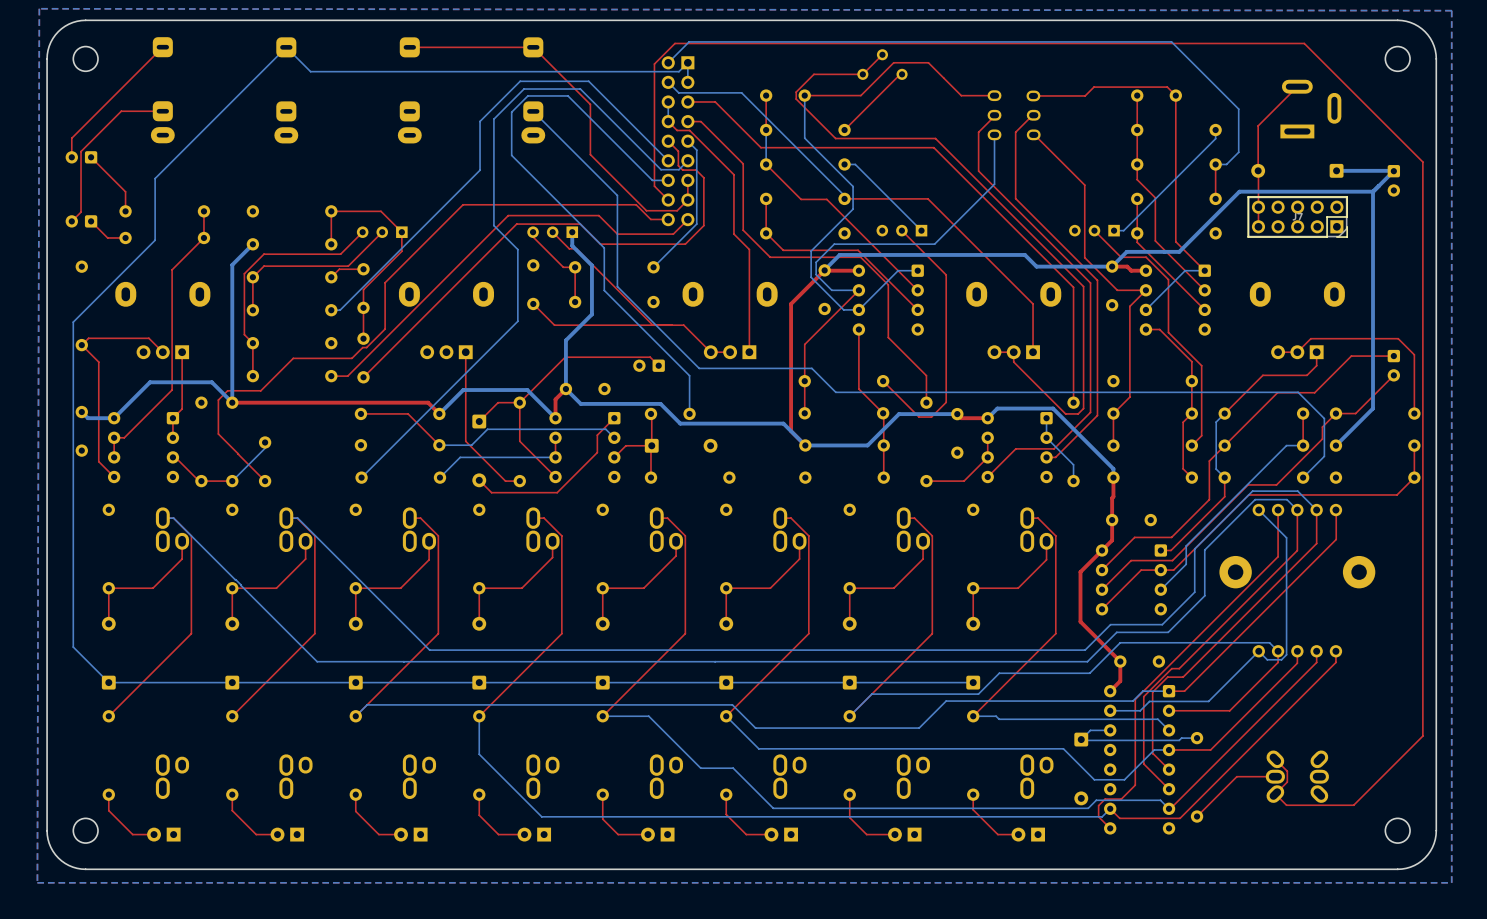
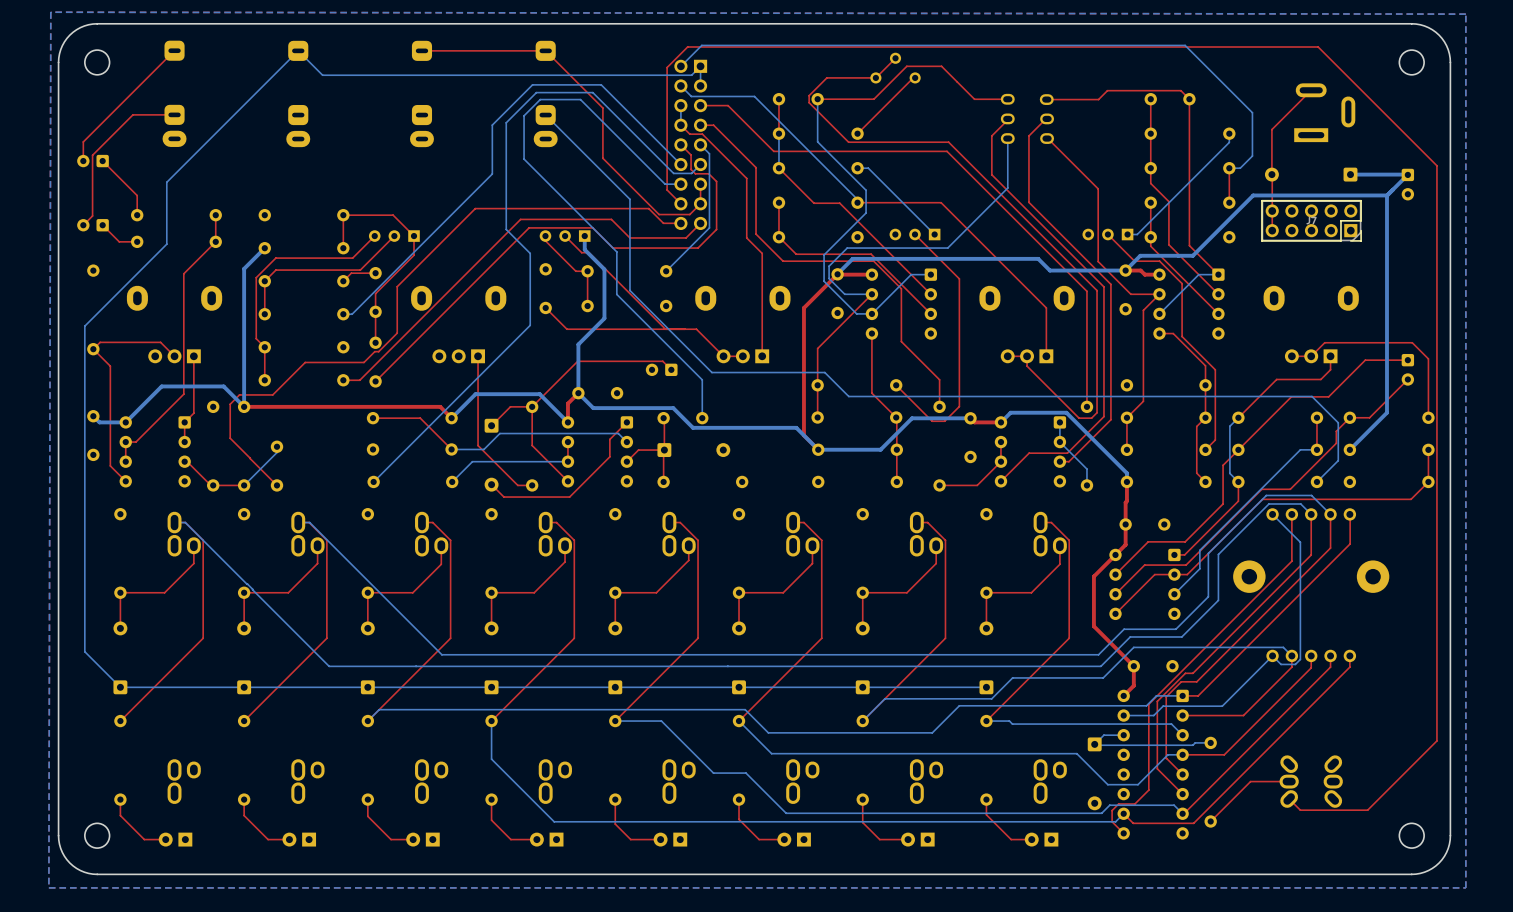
top track: (1275, 759) (1287, 771) (1287, 782) (1275, 794) -> none

